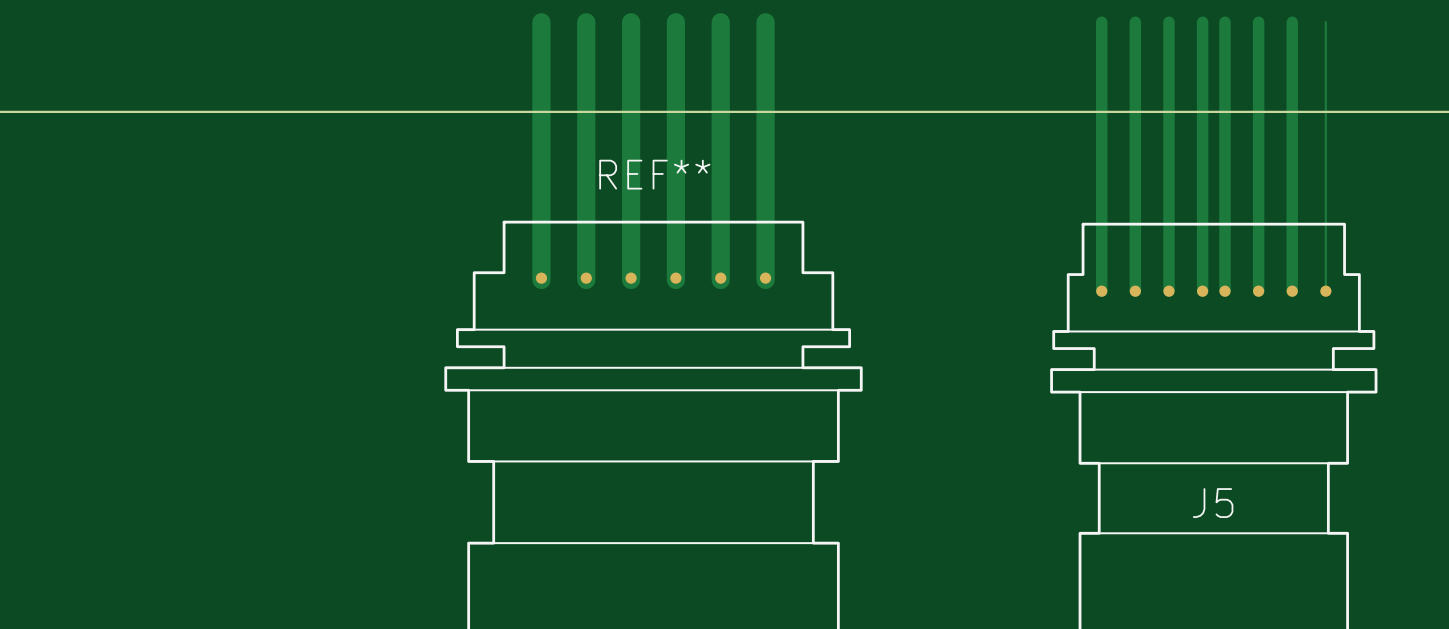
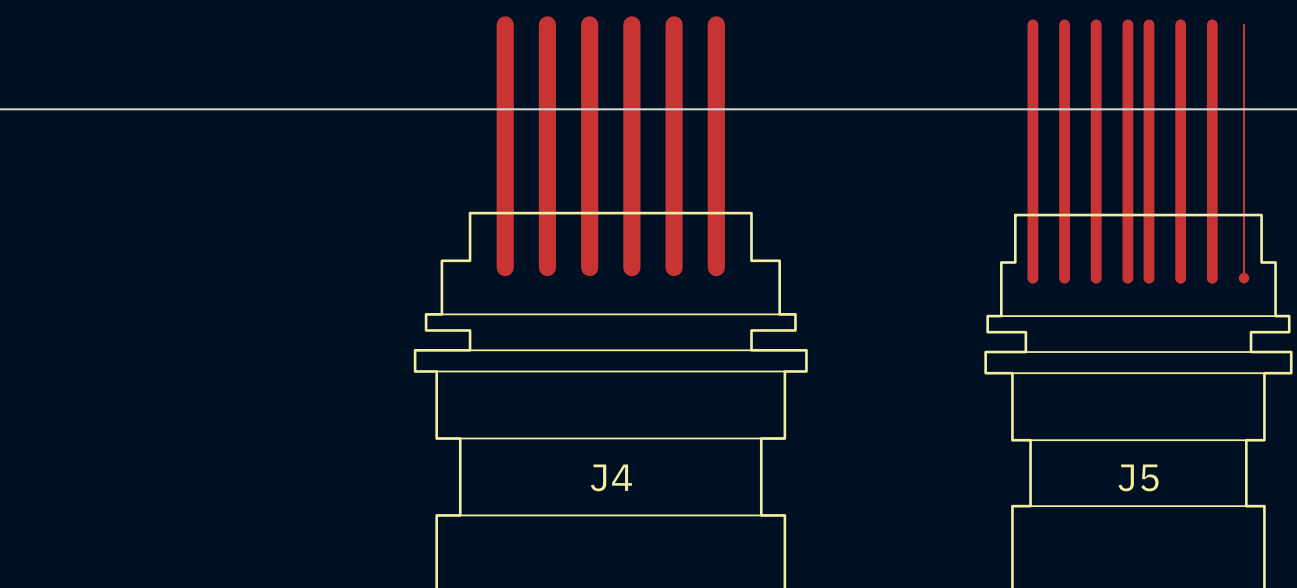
REF** name: REF** (654, 174) -> J4 (611, 477)

